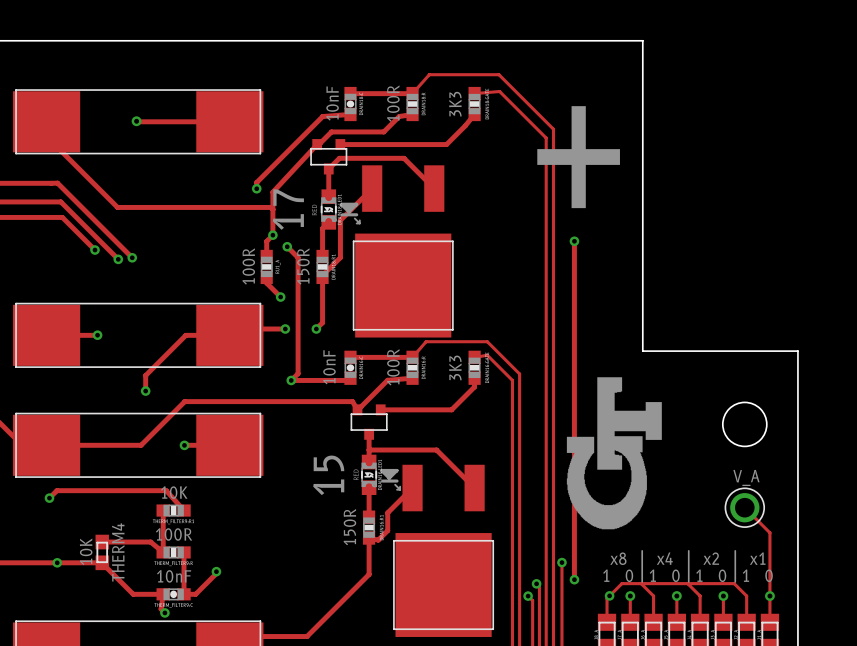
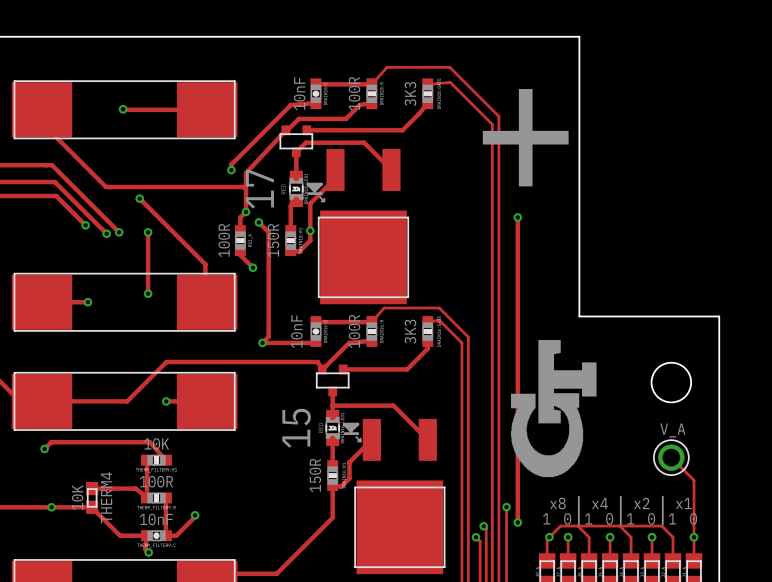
track: (372, 188) (340, 220) (340, 257) (322, 275) (322, 322) (316, 328) -> (335, 169) (335, 178) (310, 203) (310, 240) (299, 251) (290, 249)
track: none -> (139, 198) (205, 264) (205, 303)
via: none -> (139, 198)
via: none -> (310, 230)
track: none -> (148, 232) (148, 293)
via: none -> (148, 232)
via: none -> (148, 293)
track: (285, 328) (235, 328) (229, 335) (185, 335) (145, 375) (145, 391) -> none
via: (285, 328) -> none
via: (316, 328) -> none
via: (145, 391) -> none

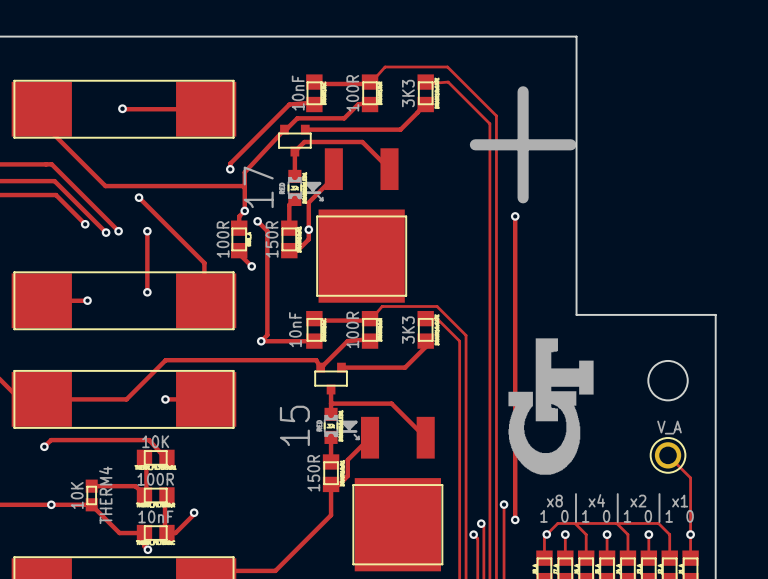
part footprint: [310, 78, 322, 110] -> [306, 74, 323, 113]
part footprint: [366, 78, 378, 110] -> [361, 74, 379, 113]
part footprint: [422, 78, 434, 110] -> [417, 74, 434, 113]
part footprint: [234, 225, 246, 257] -> [230, 220, 248, 259]
part footprint: [285, 225, 297, 257] -> [281, 220, 298, 259]
part footprint: [310, 316, 322, 347] -> [306, 310, 323, 349]
part footprint: [366, 316, 378, 347] -> [361, 310, 379, 349]
part footprint: [422, 316, 434, 347] -> [417, 310, 434, 349]
part footprint: [141, 454, 172, 466] -> [136, 449, 175, 467]
part footprint: [327, 460, 339, 491] -> [322, 454, 340, 493]
part footprint: [141, 492, 172, 504] -> [136, 487, 175, 504]
part footprint: [141, 530, 172, 542] -> [136, 524, 175, 542]

